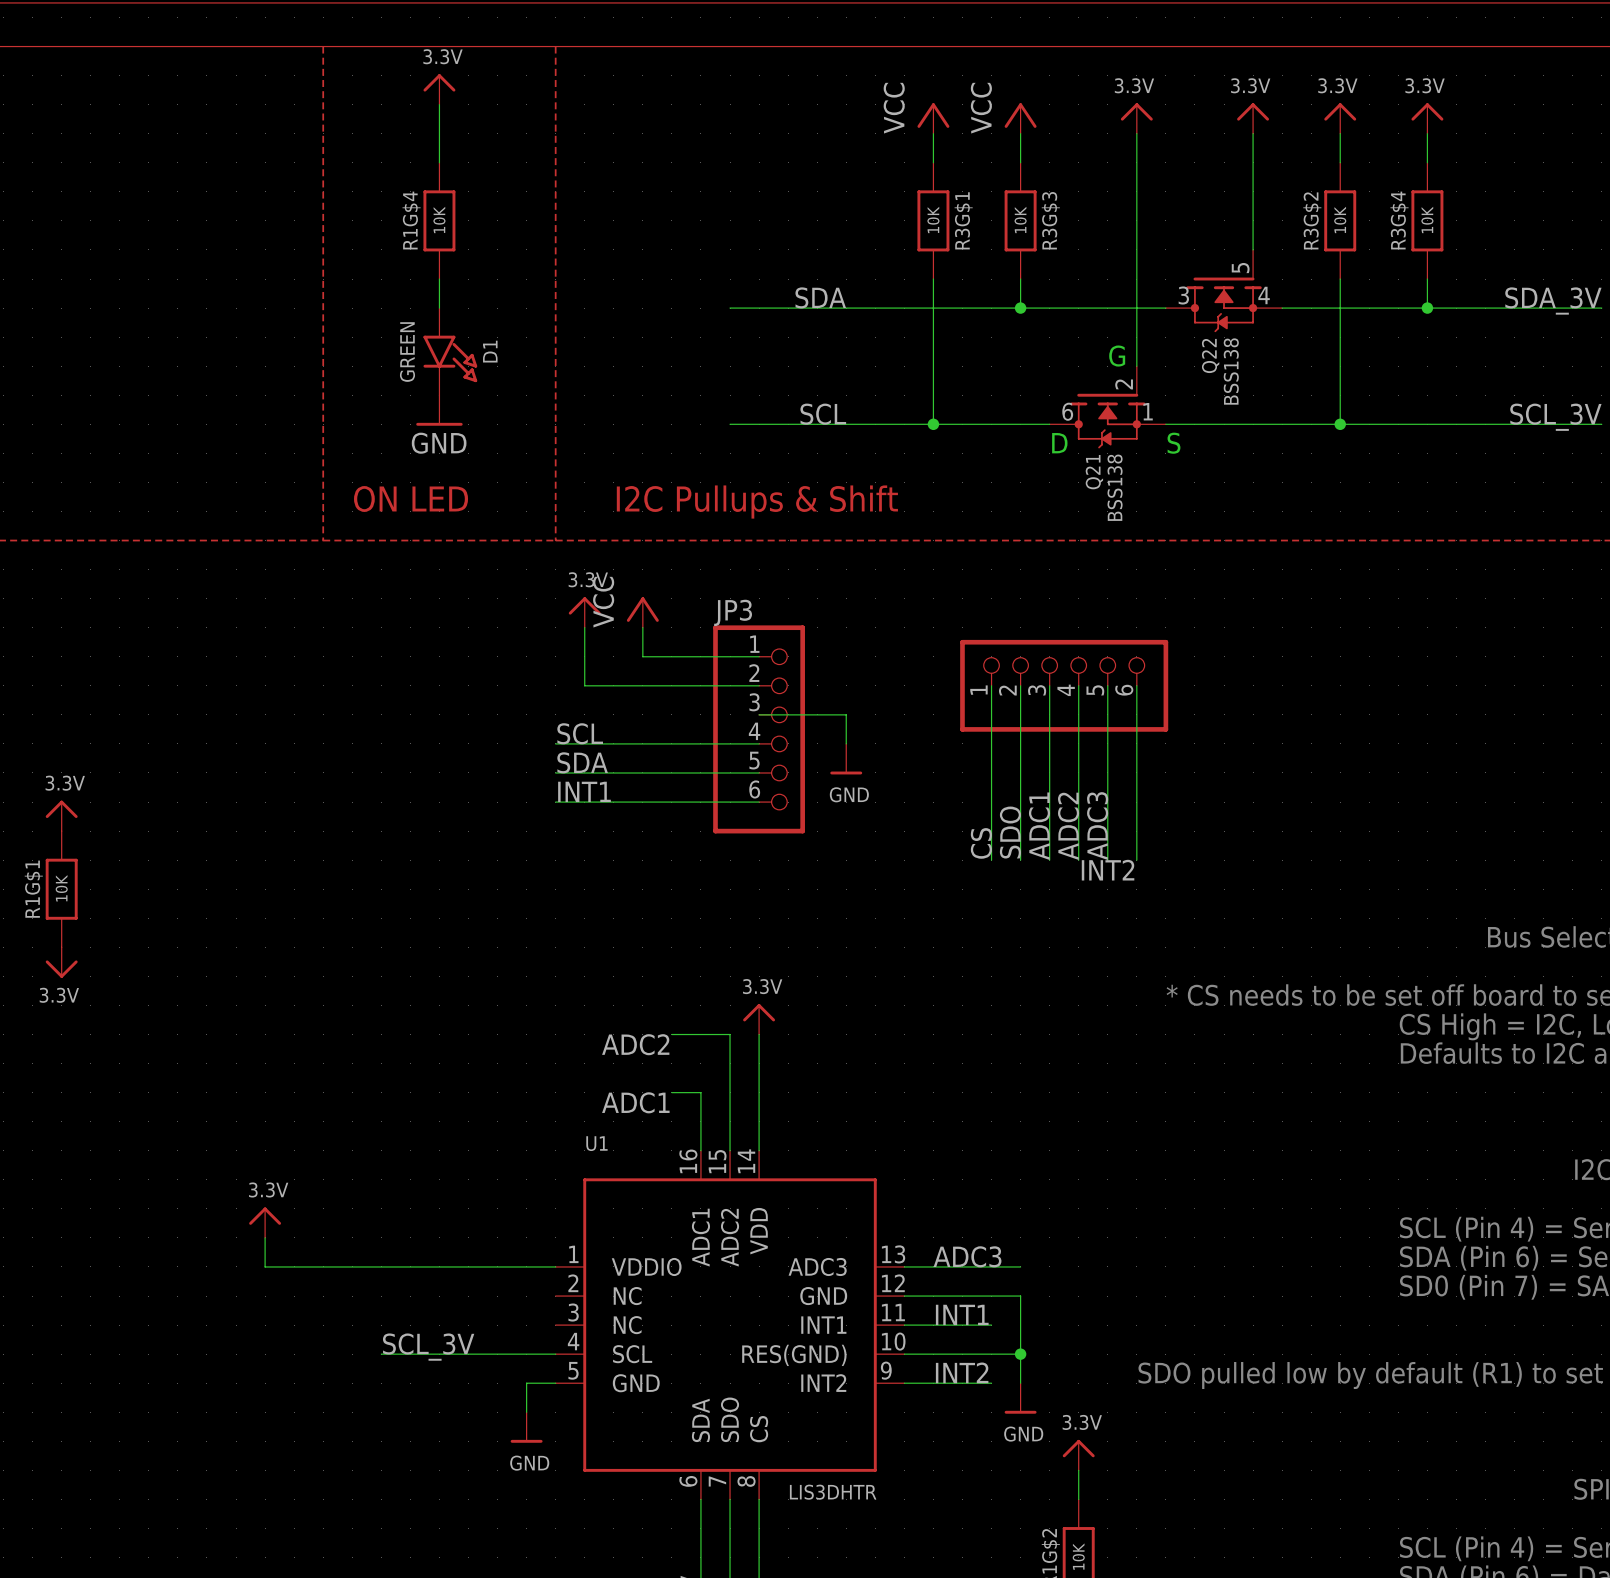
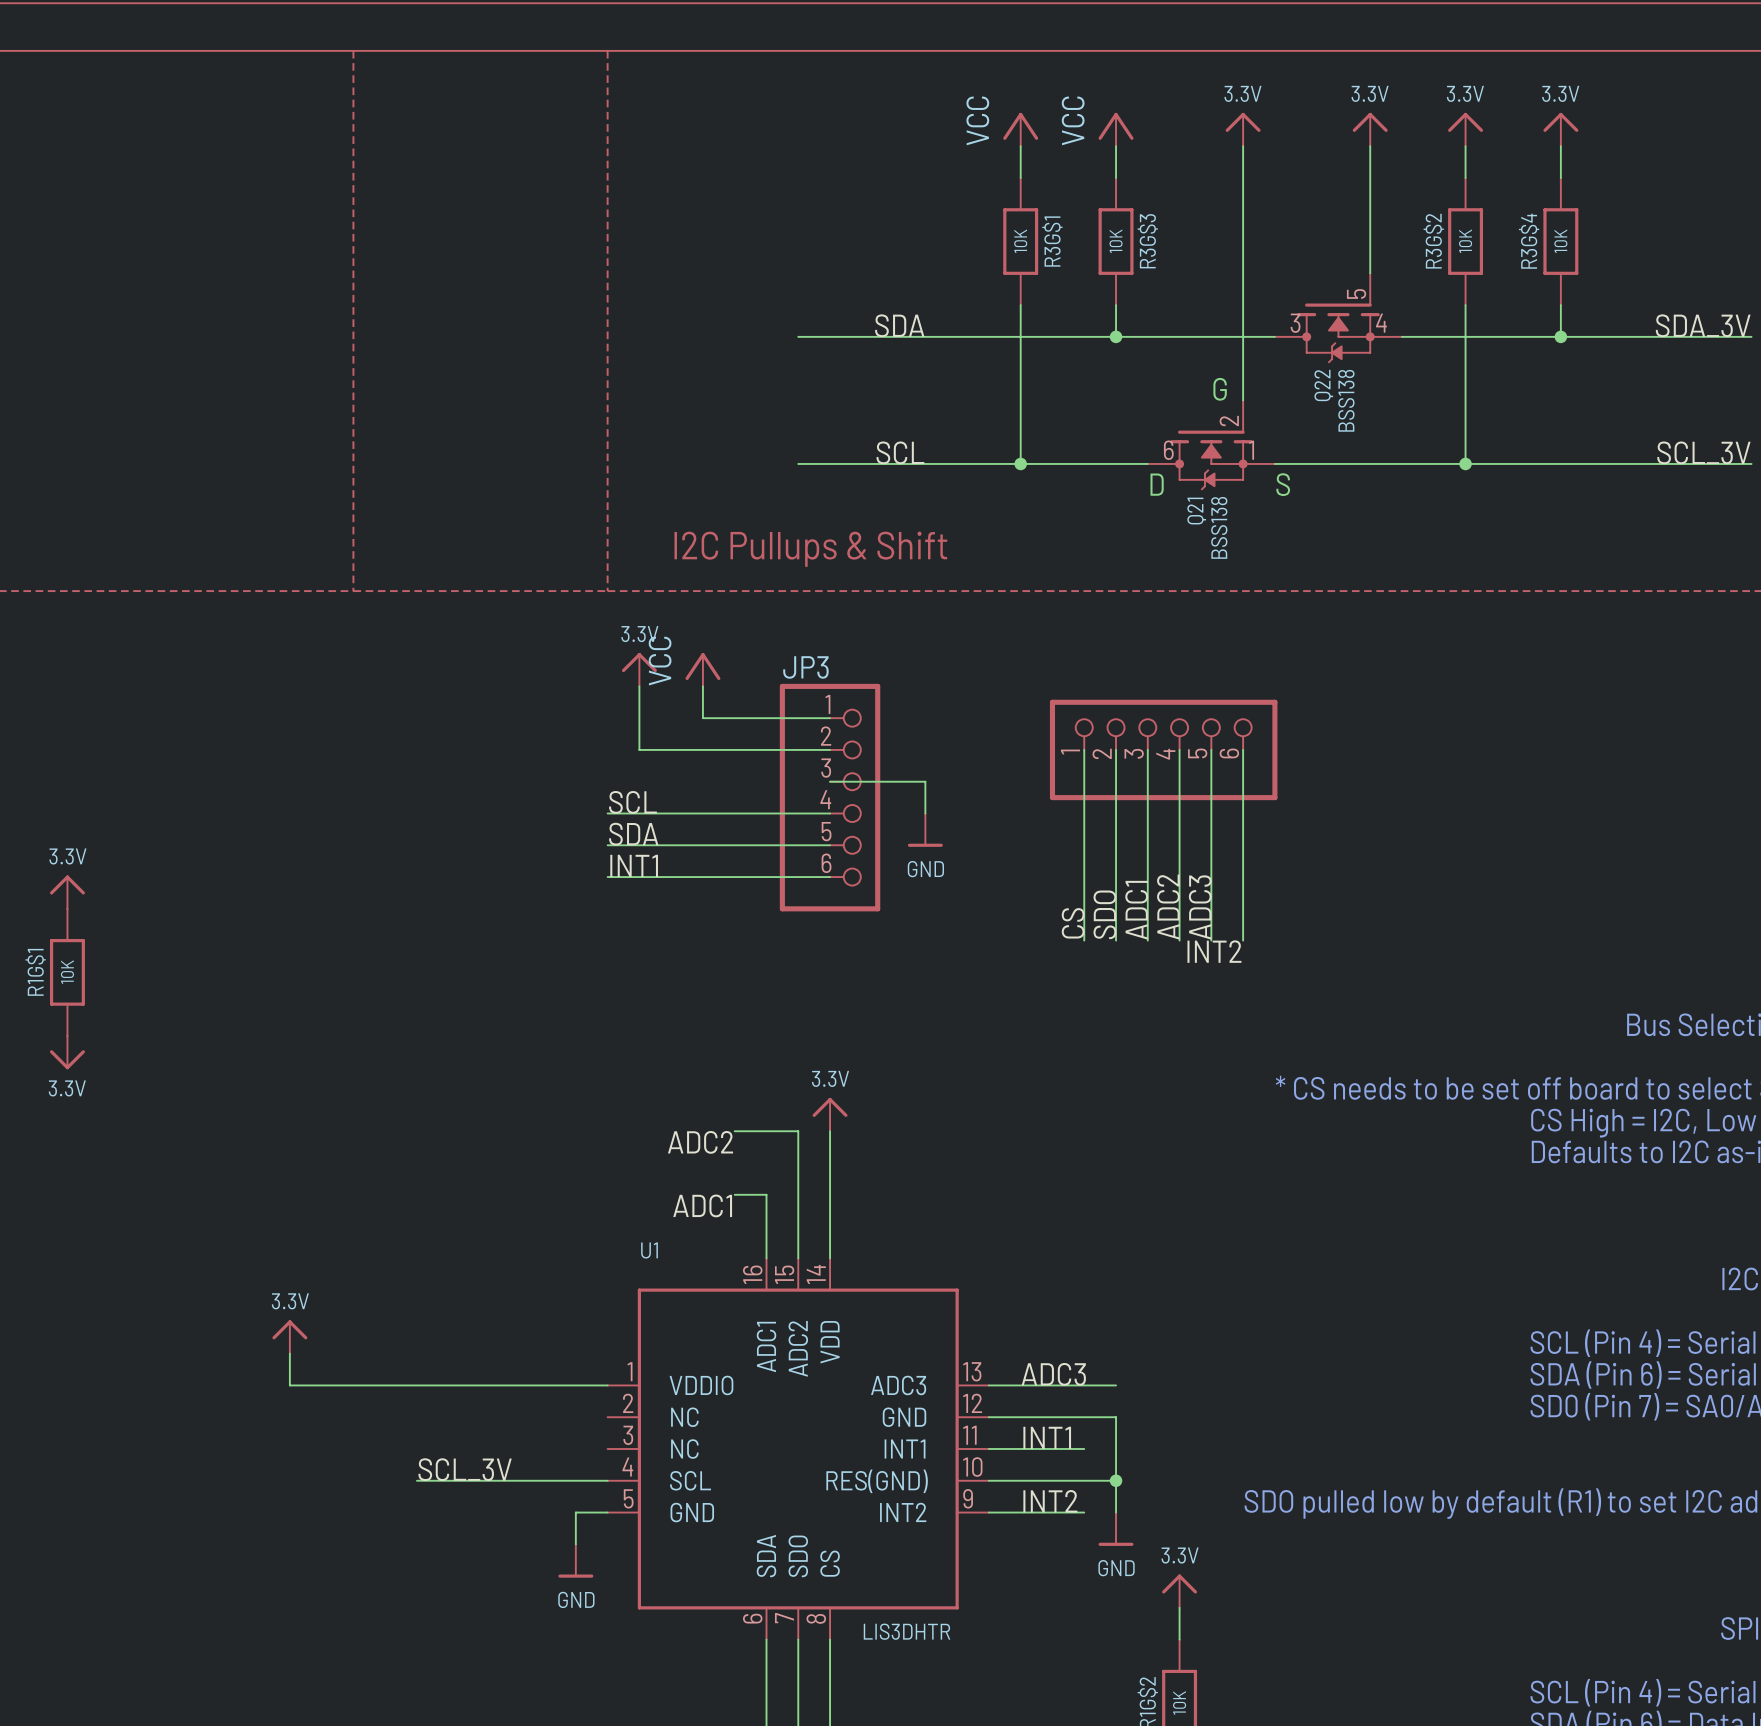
power symbol: 3.3V (439, 89) -> none
wire: (439, 104) (439, 162) -> none
R1G$4: 10K (439, 220) -> none
wire: (439, 279) (439, 308) -> none
D1: GREEN (450, 351) -> none
power symbol: GND (439, 410) -> none
text: ON LED (411, 499) -> none

